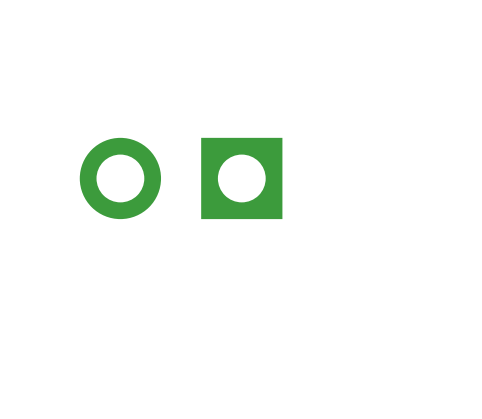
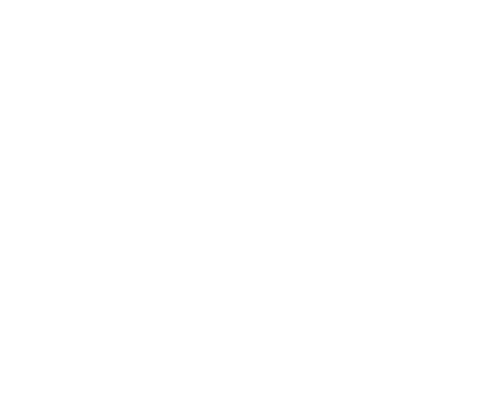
part: (181, 178) -> none

